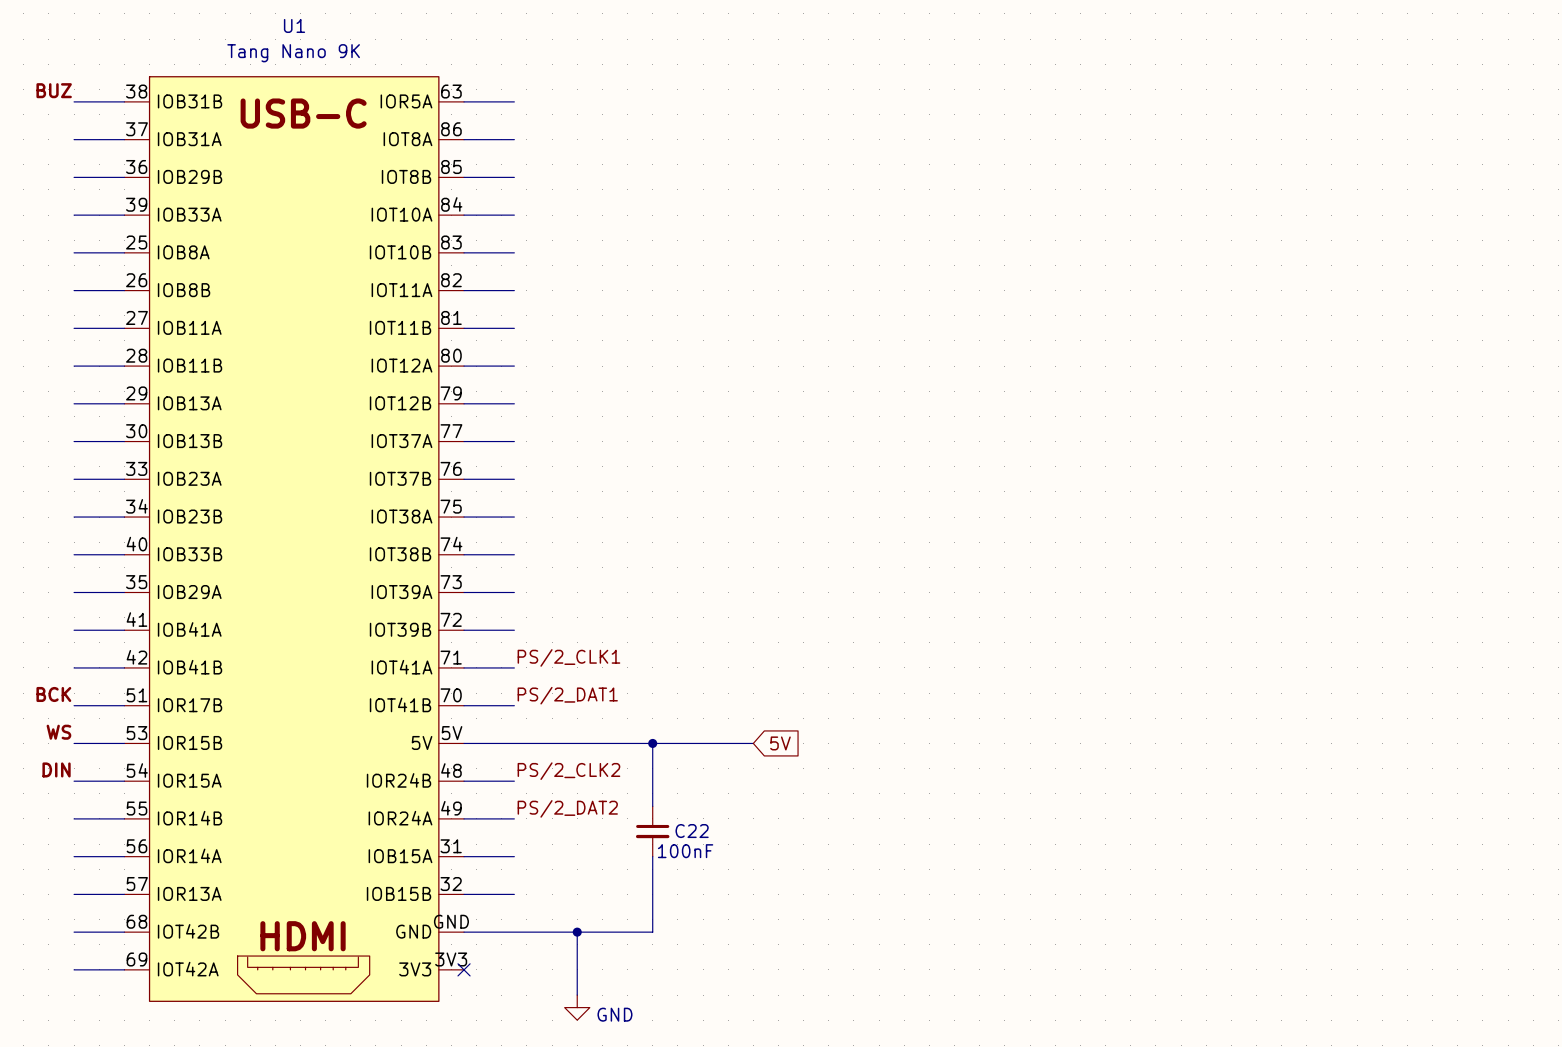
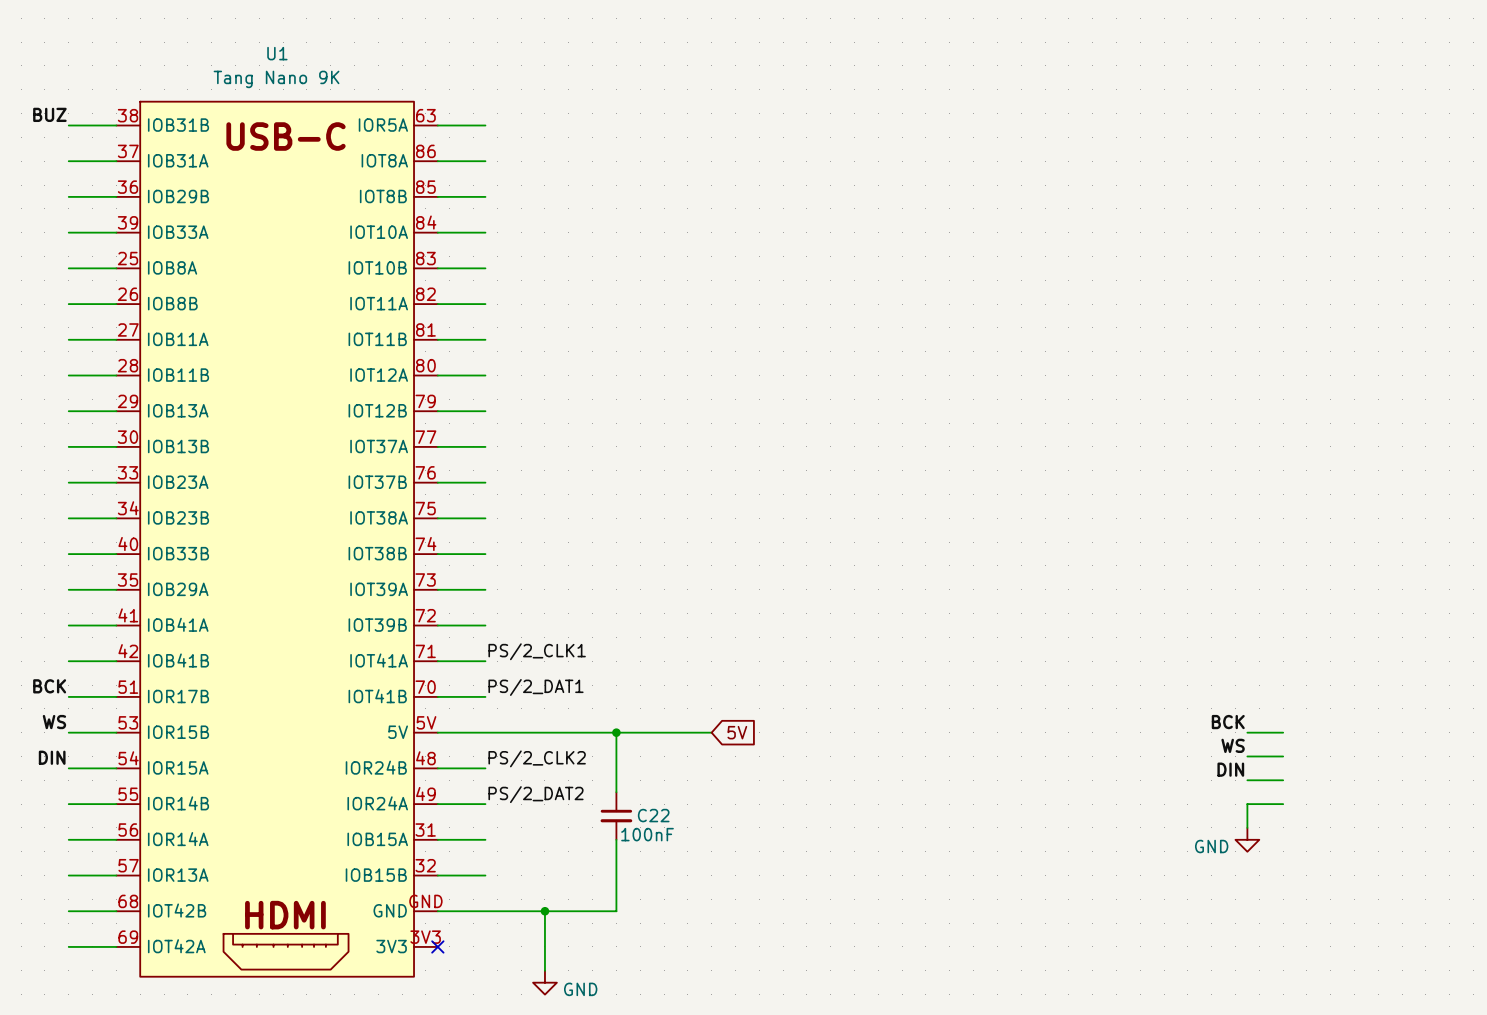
label: none -> BCK (1228, 722)
wire: none -> (1247, 732) (1283, 732)
label: none -> WS (1233, 745)
wire: none -> (1247, 756) (1283, 756)
label: none -> DIN (1230, 769)
wire: none -> (1247, 780) (1283, 780)
wire: none -> (1283, 804) (1247, 804) (1247, 827)
power symbol: none -> GND (1247, 839)

